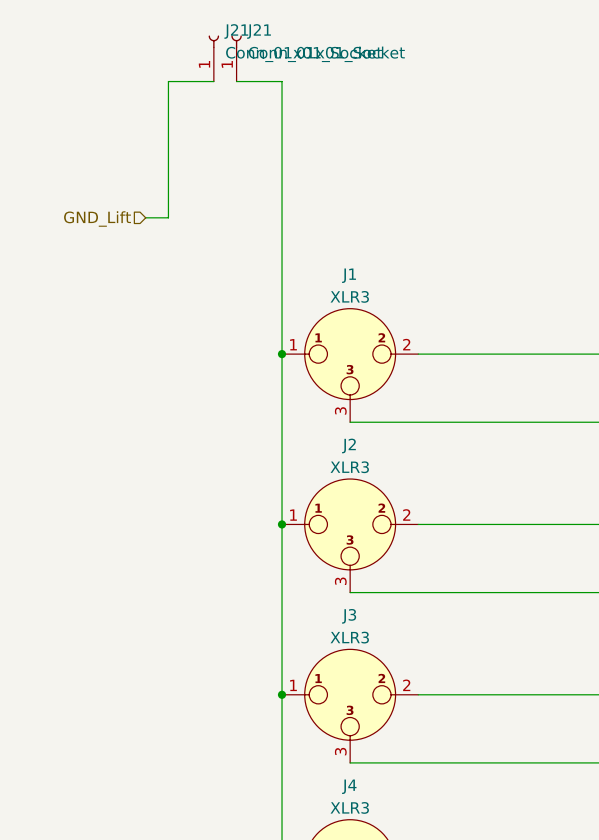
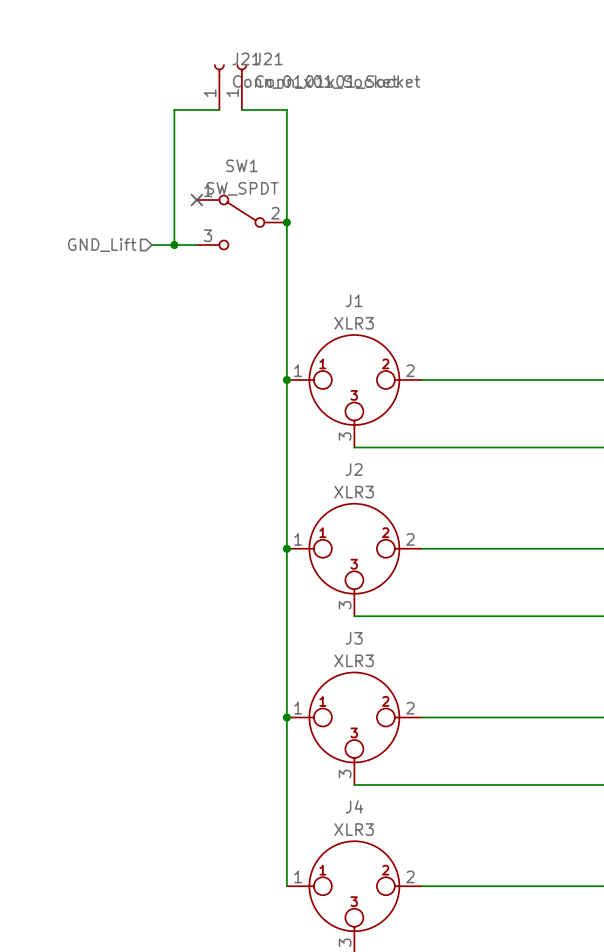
no-connect mark: none -> (196, 200)
SW1: none -> SW_SPDT (241, 222)
junction: none -> (286, 222)
wire: none -> (174, 245) (196, 245)
junction: none -> (174, 245)

